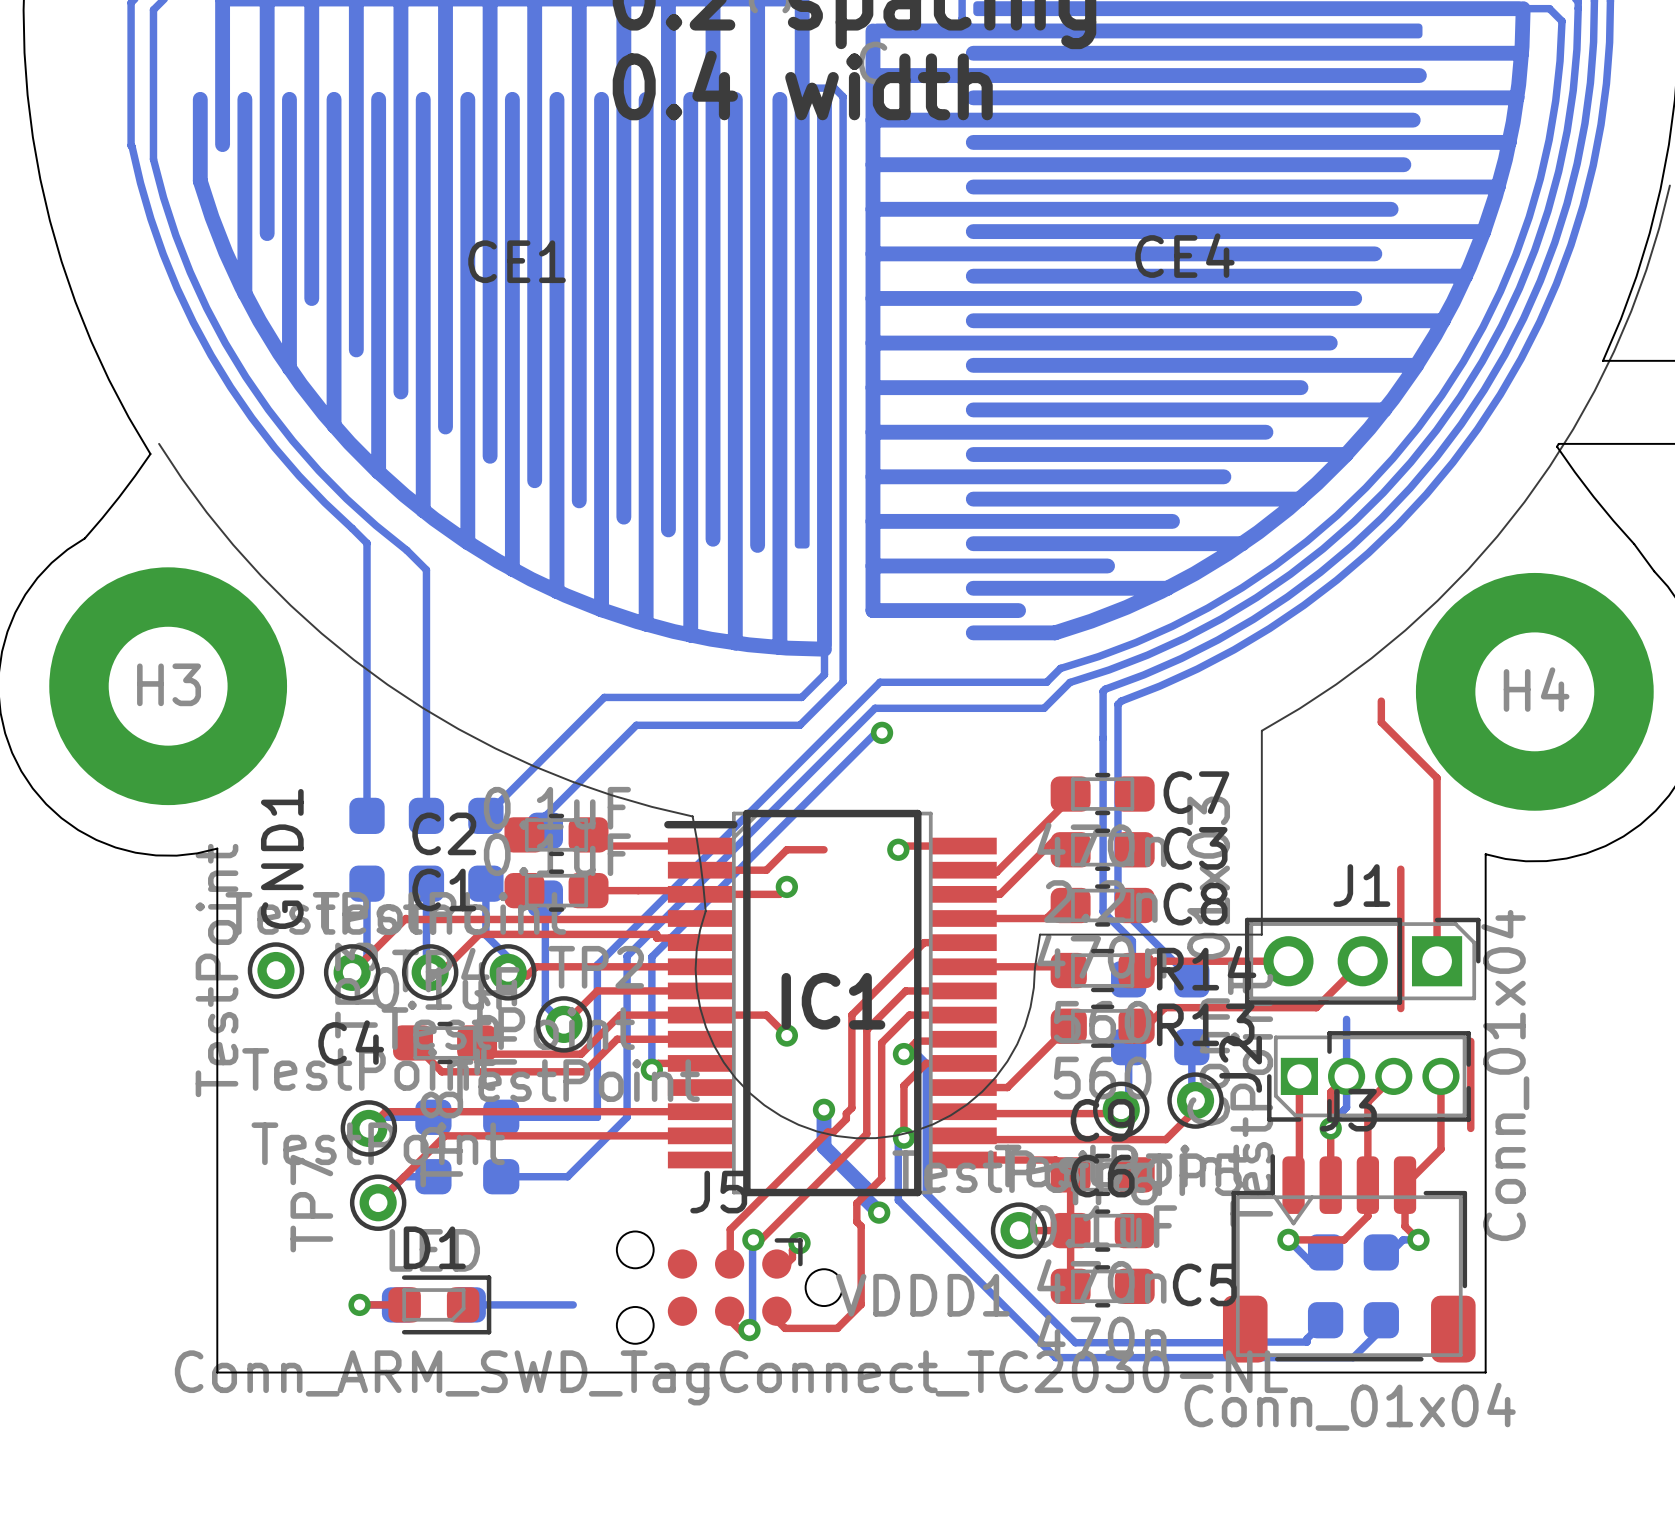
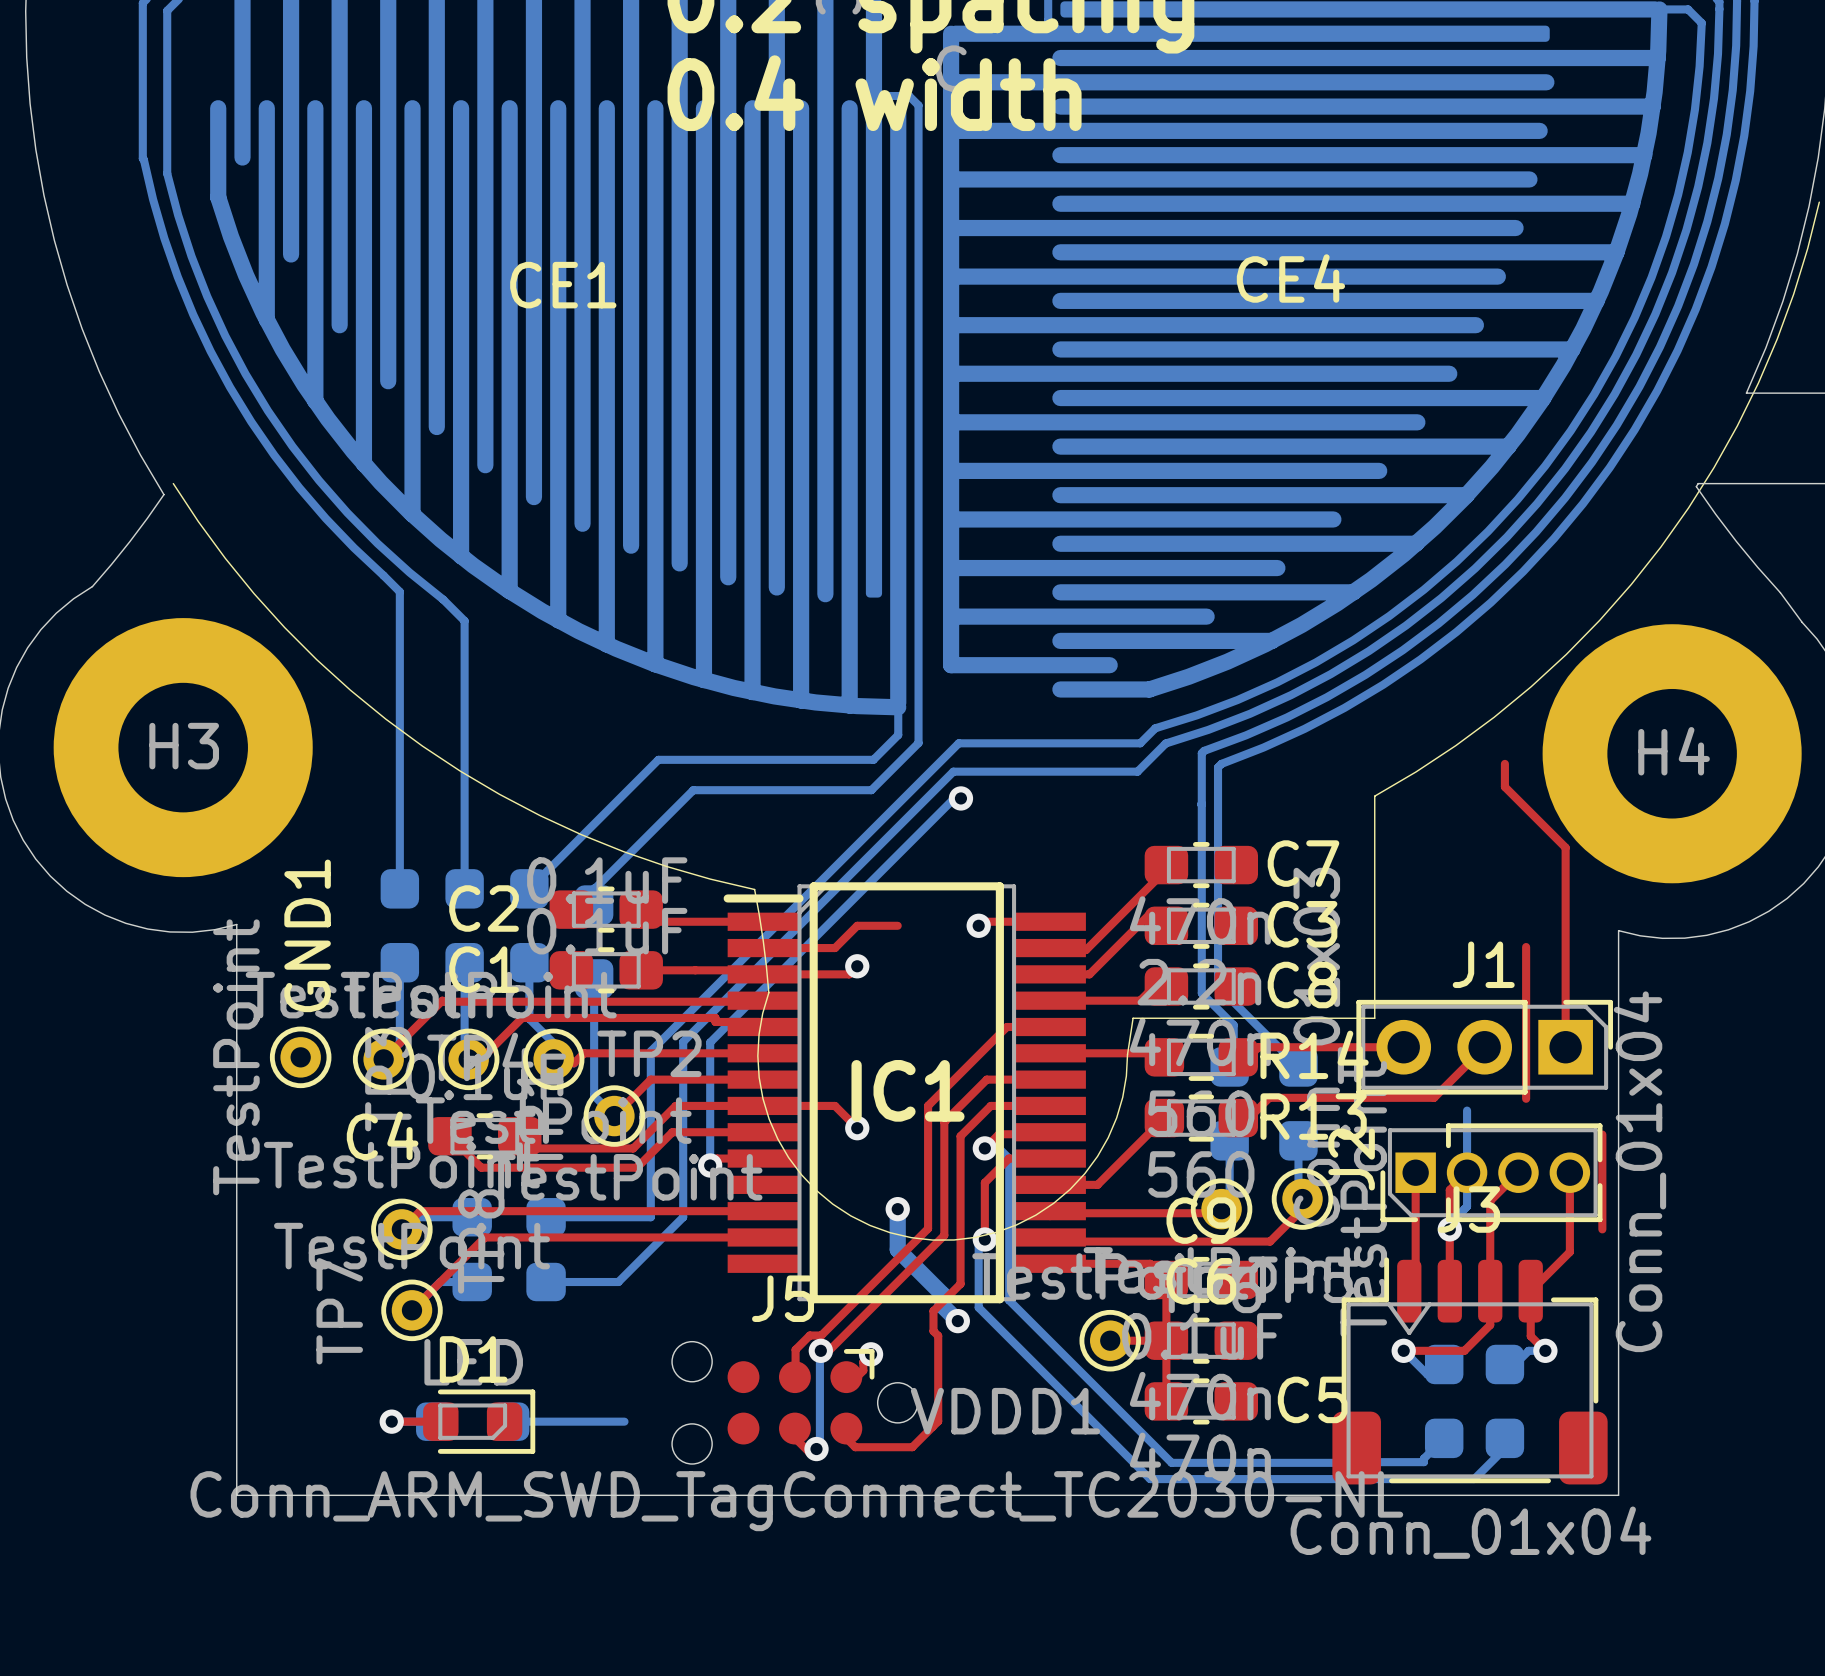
top track: (851, 1107) (846, 1113) (846, 1119) (833, 1132) (827, 1132) (730, 1229) (730, 1238) -> (928, 1207) (928, 1228) (821, 1335) (809, 1335) (795, 1349)

